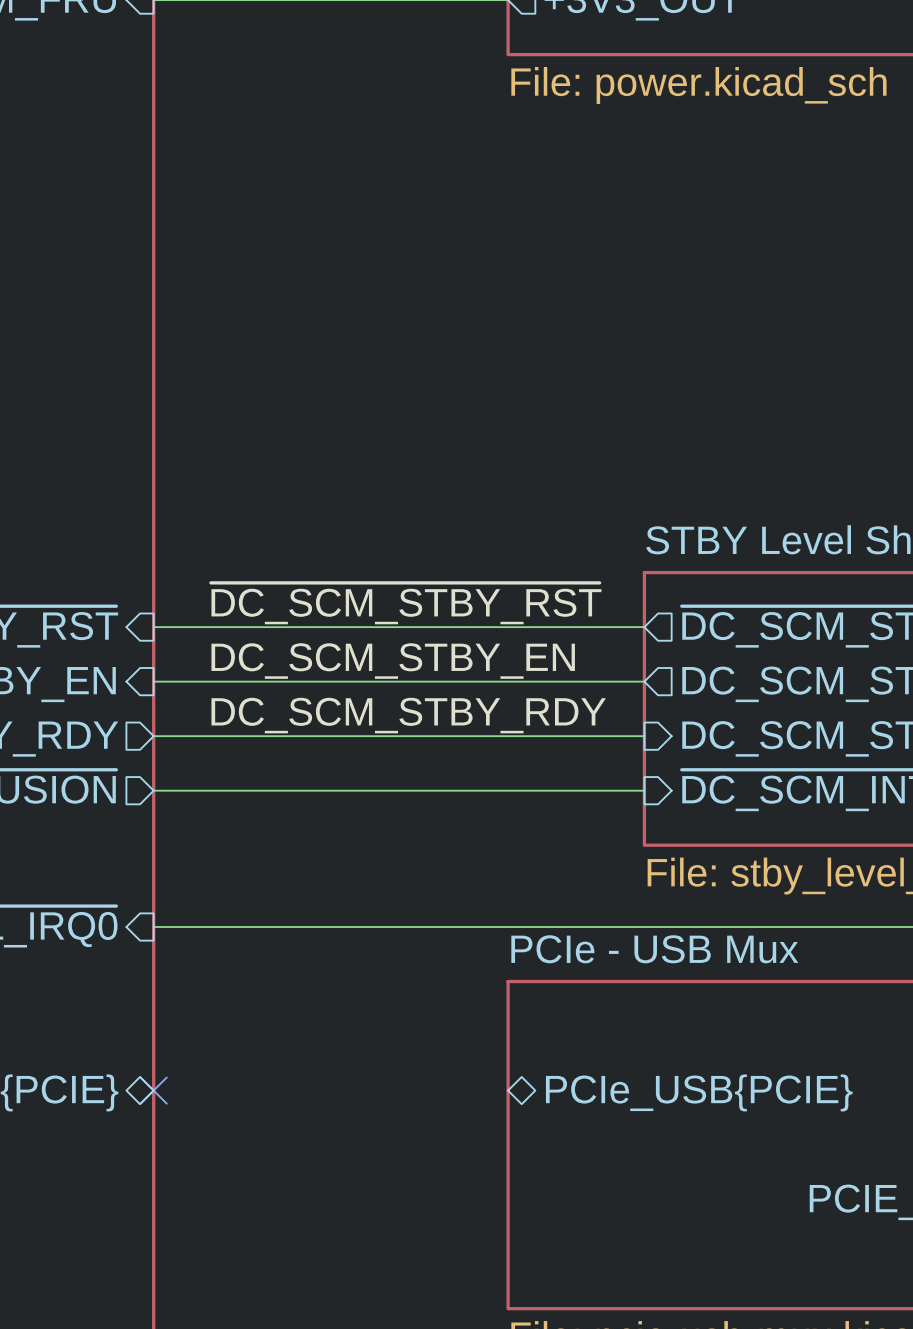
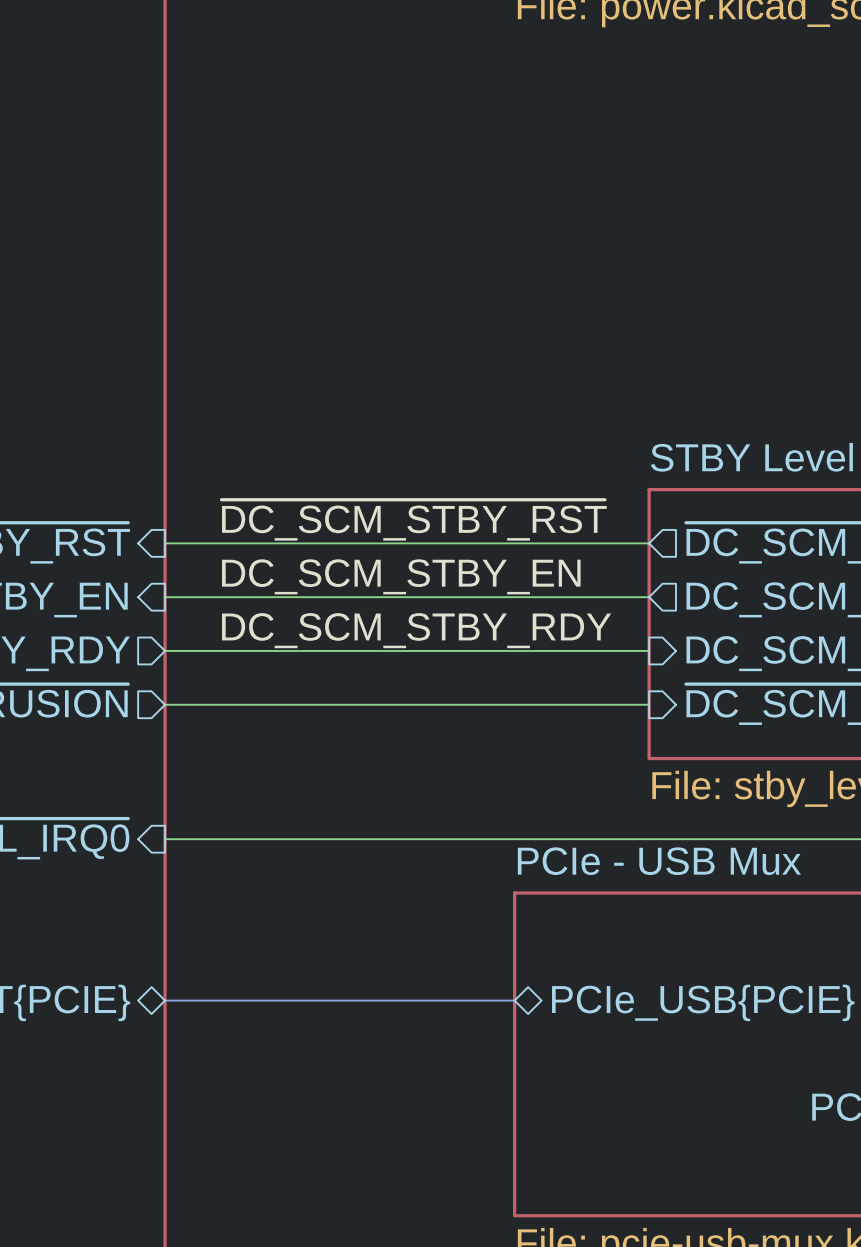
bus: none -> (165, 1000) (514, 1000)
no-connect mark: (153, 1090) -> none

